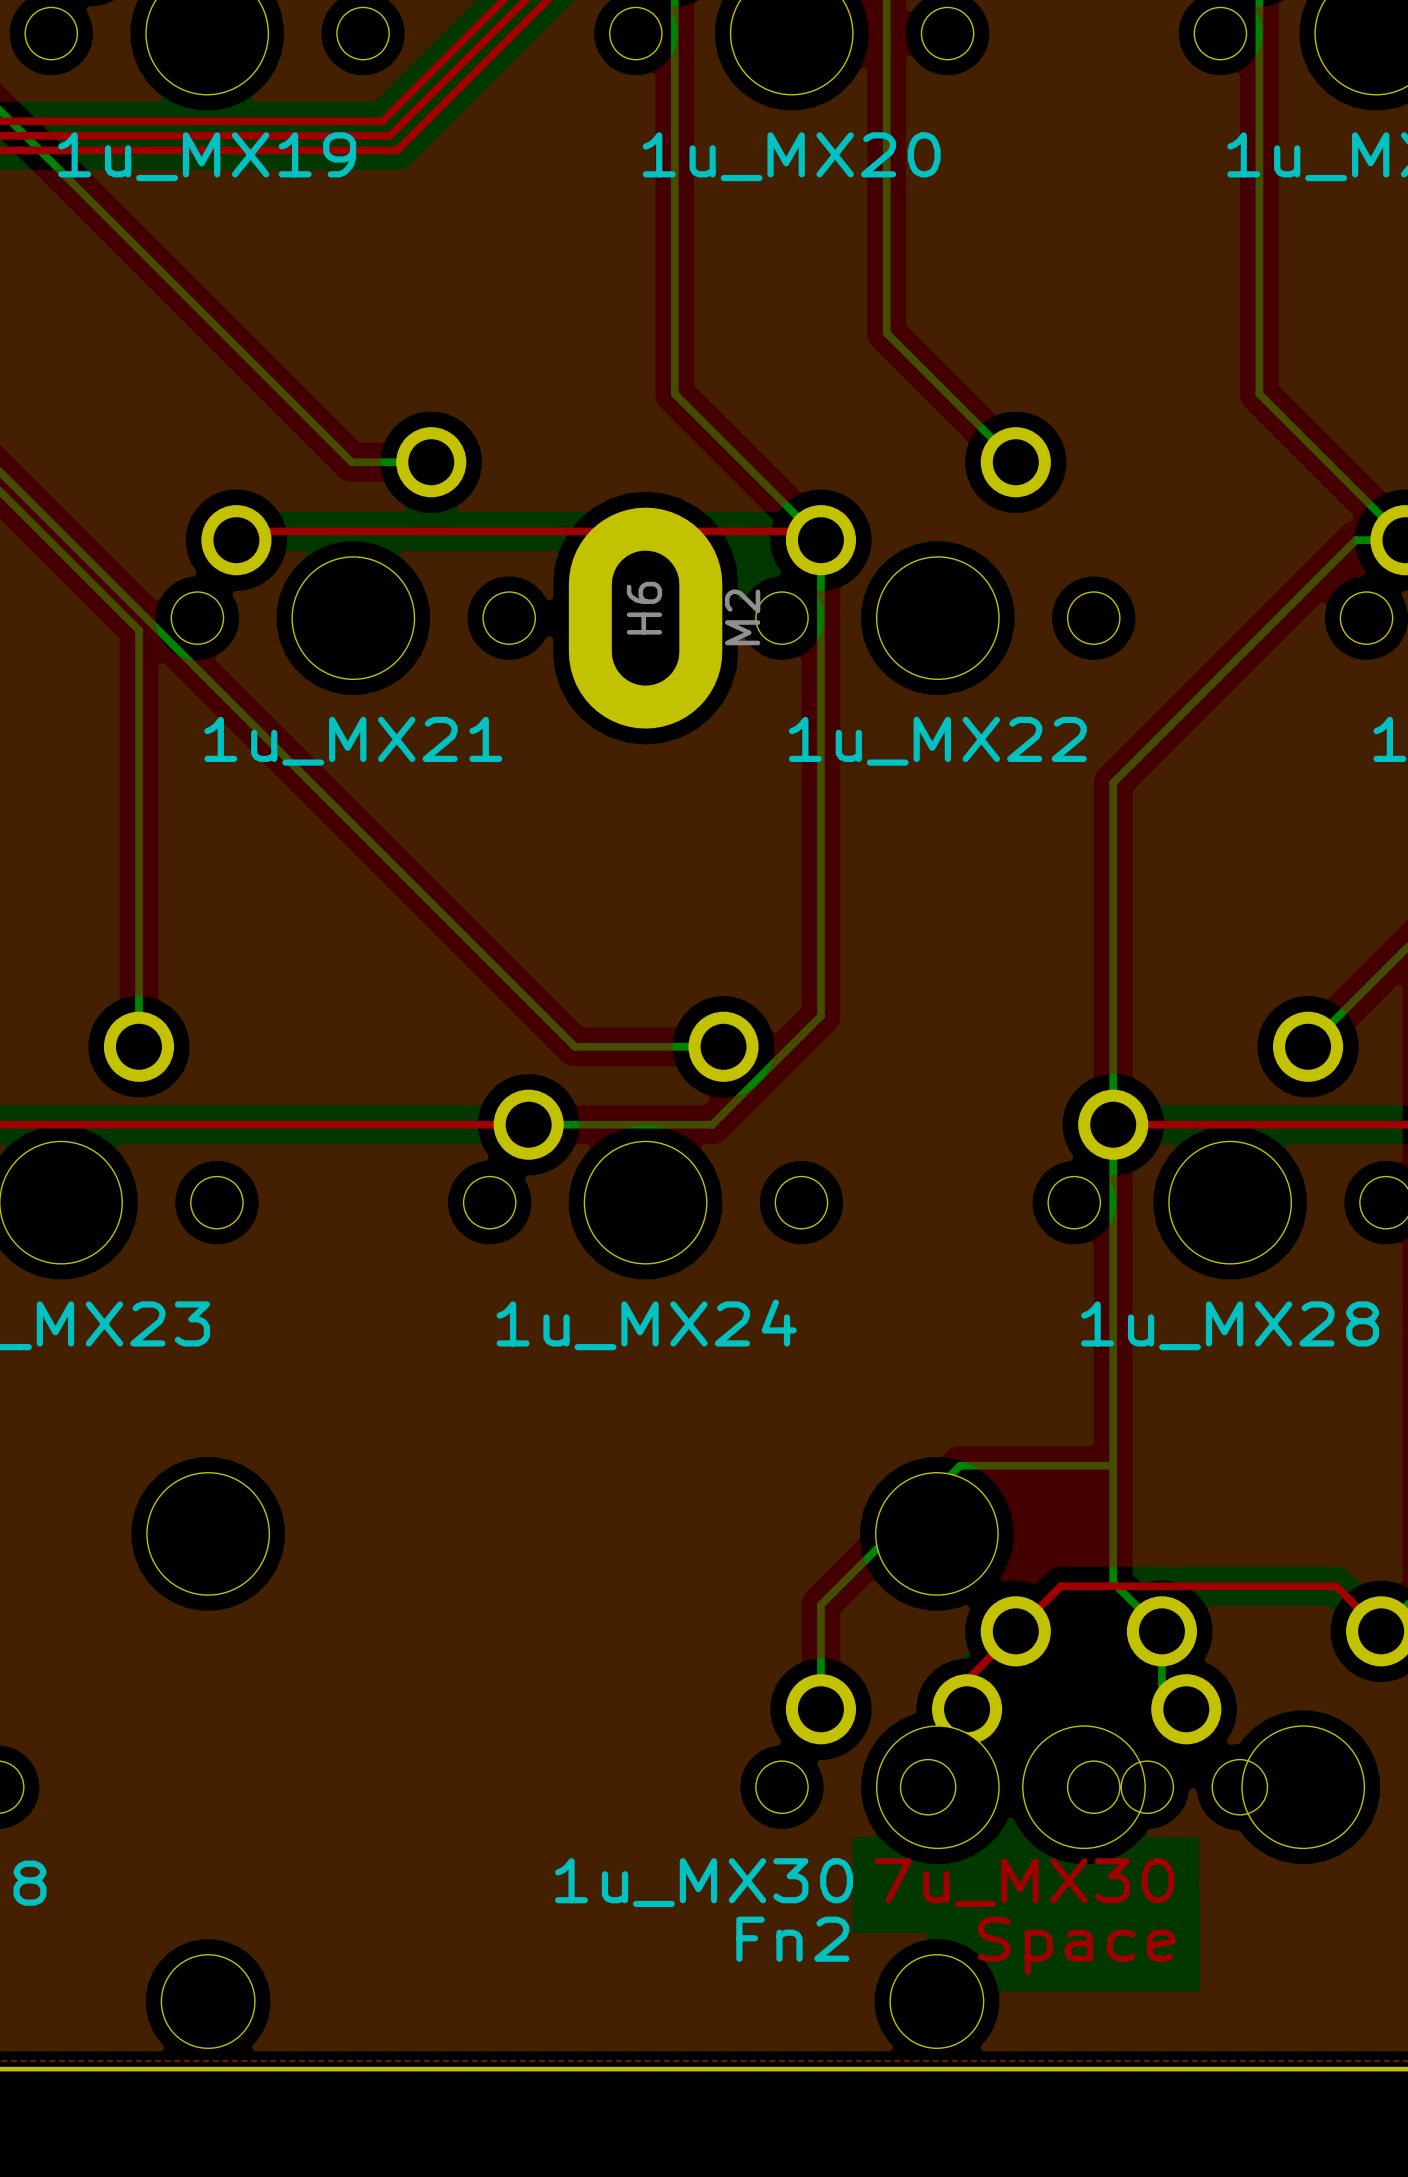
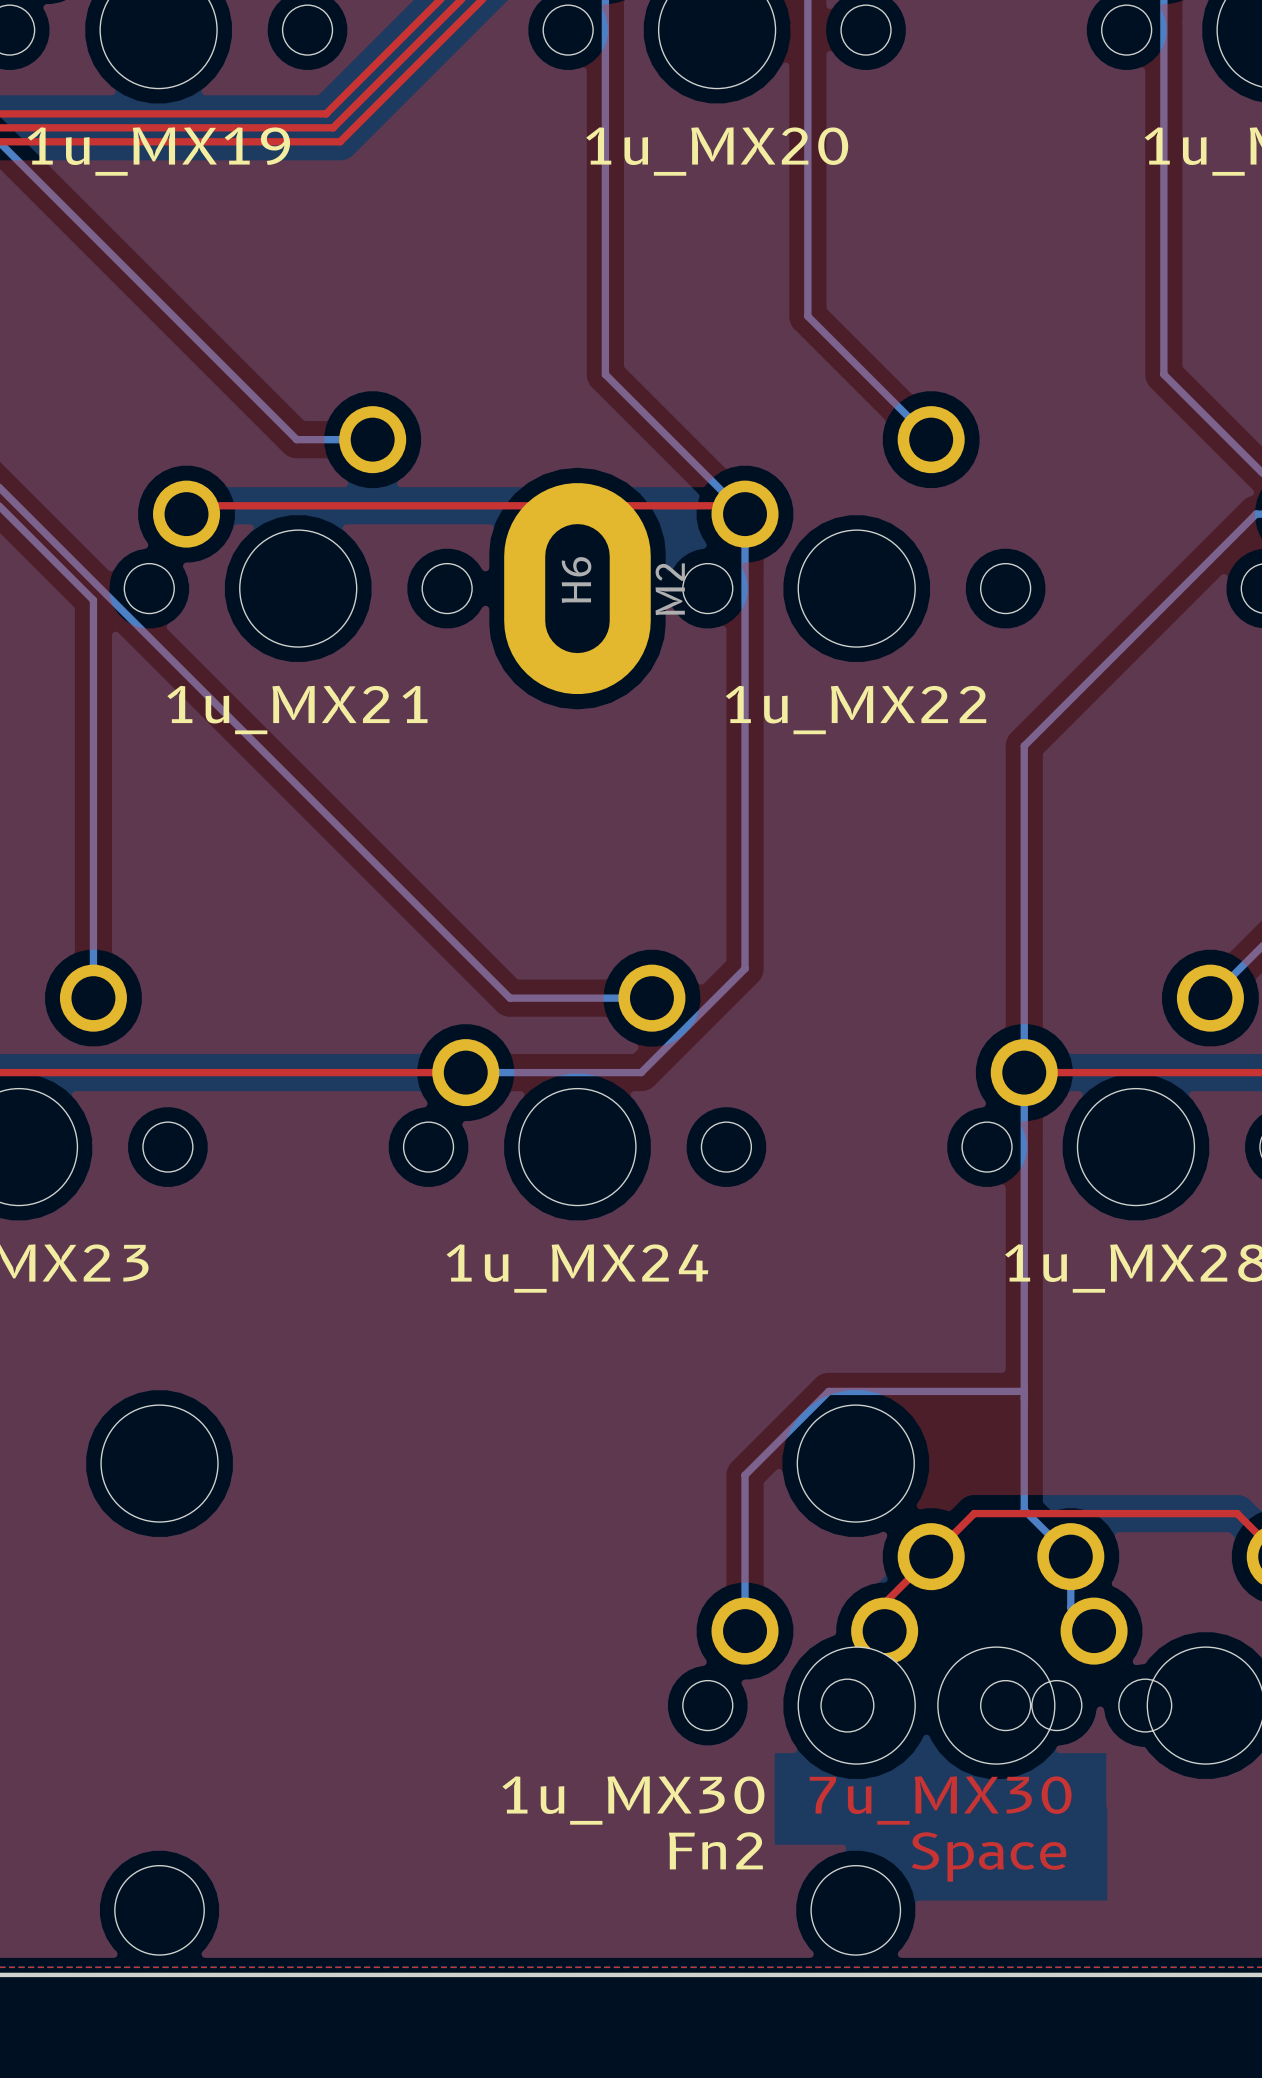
bottom track: (1113, 1465) (960, 1465) (820, 1604) -> (1024, 1391) (828, 1391) (745, 1475) (745, 1531)

